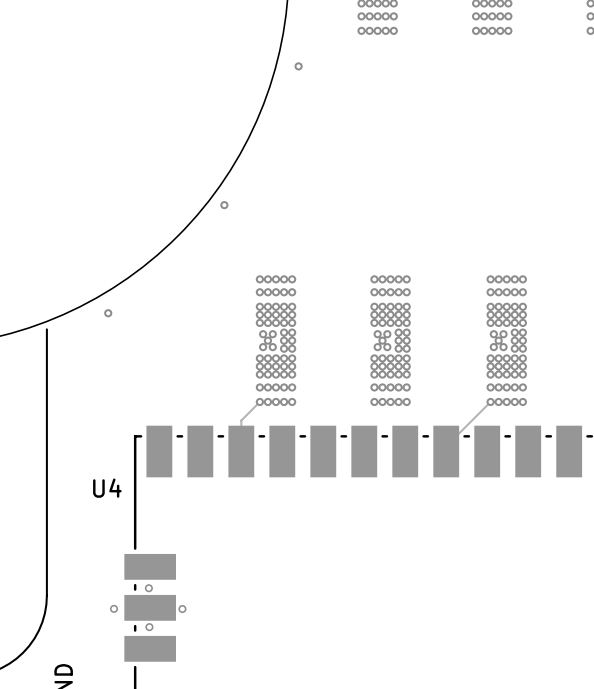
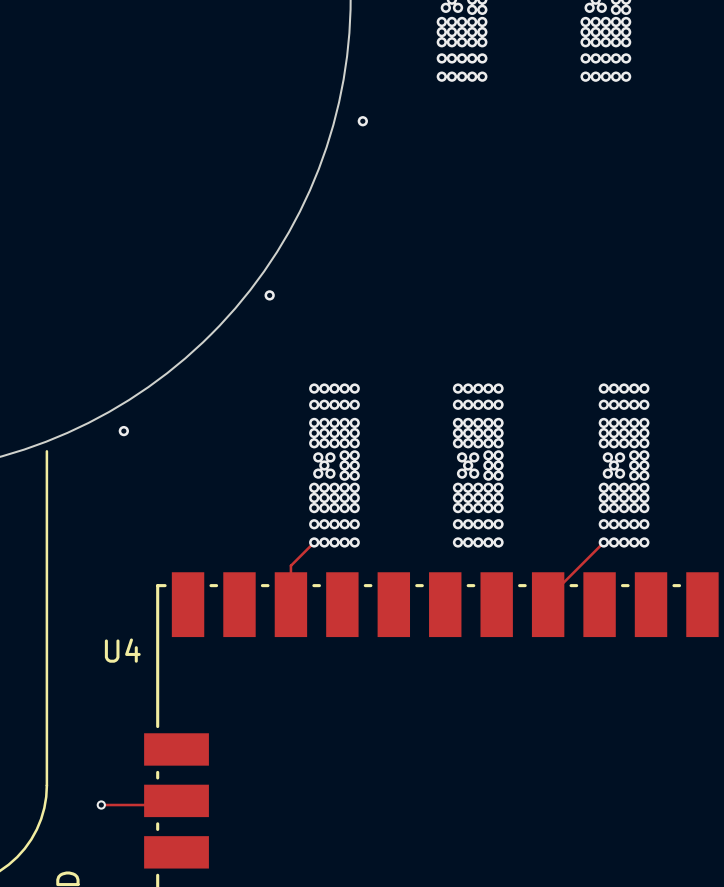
via: (148, 588) -> none
track: none -> (175, 799) (176, 800) (172, 805) (101, 805)
via: (114, 608) -> none
via: (182, 609) -> none
via: none -> (101, 805)
via: (149, 627) -> none

